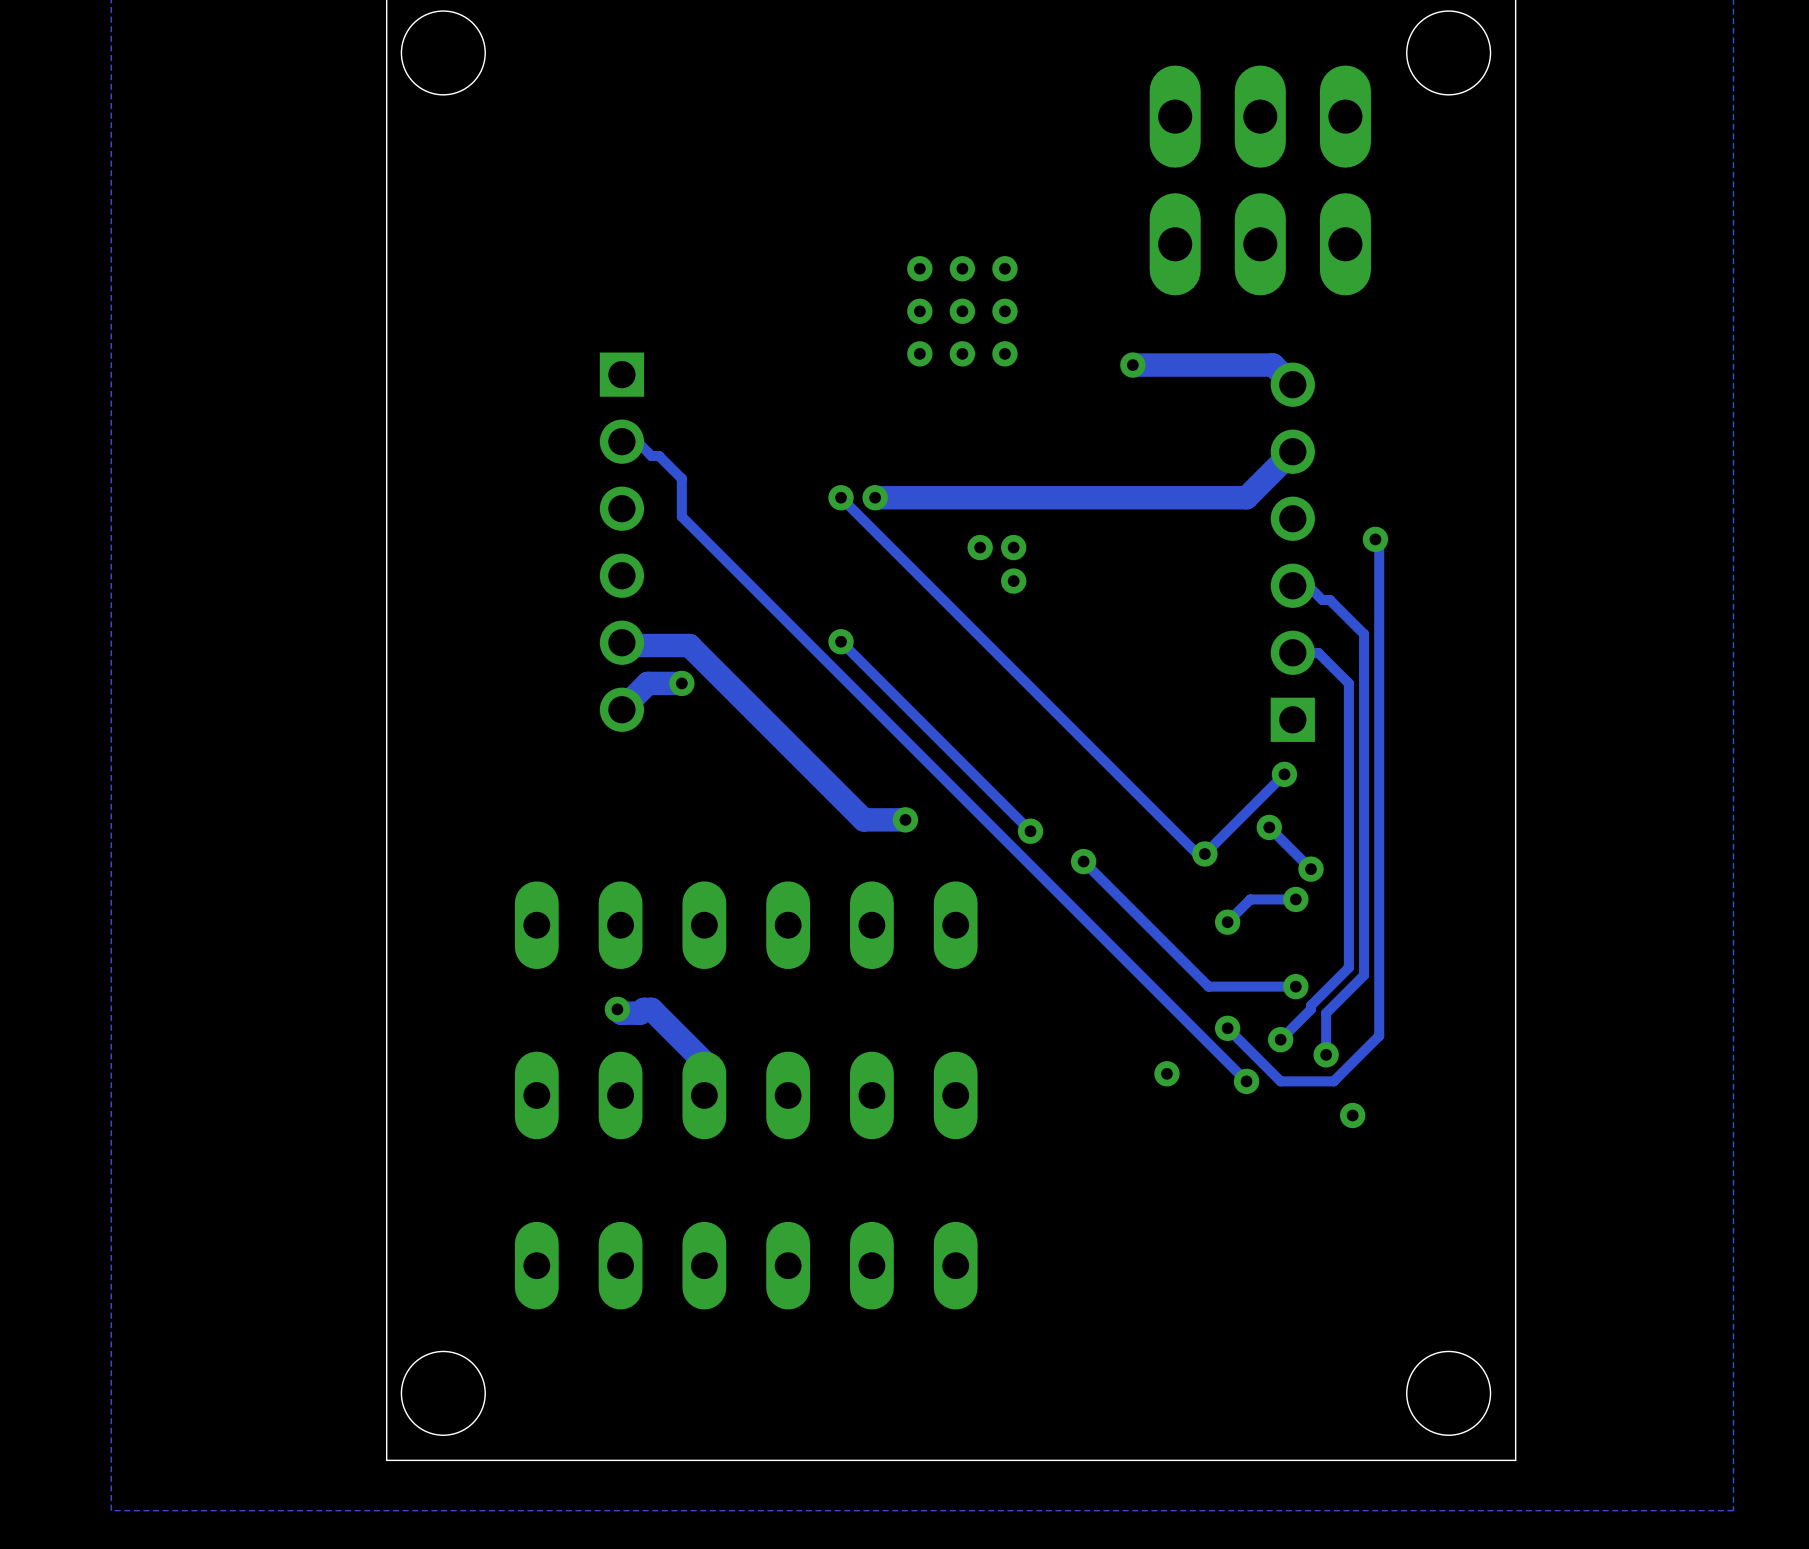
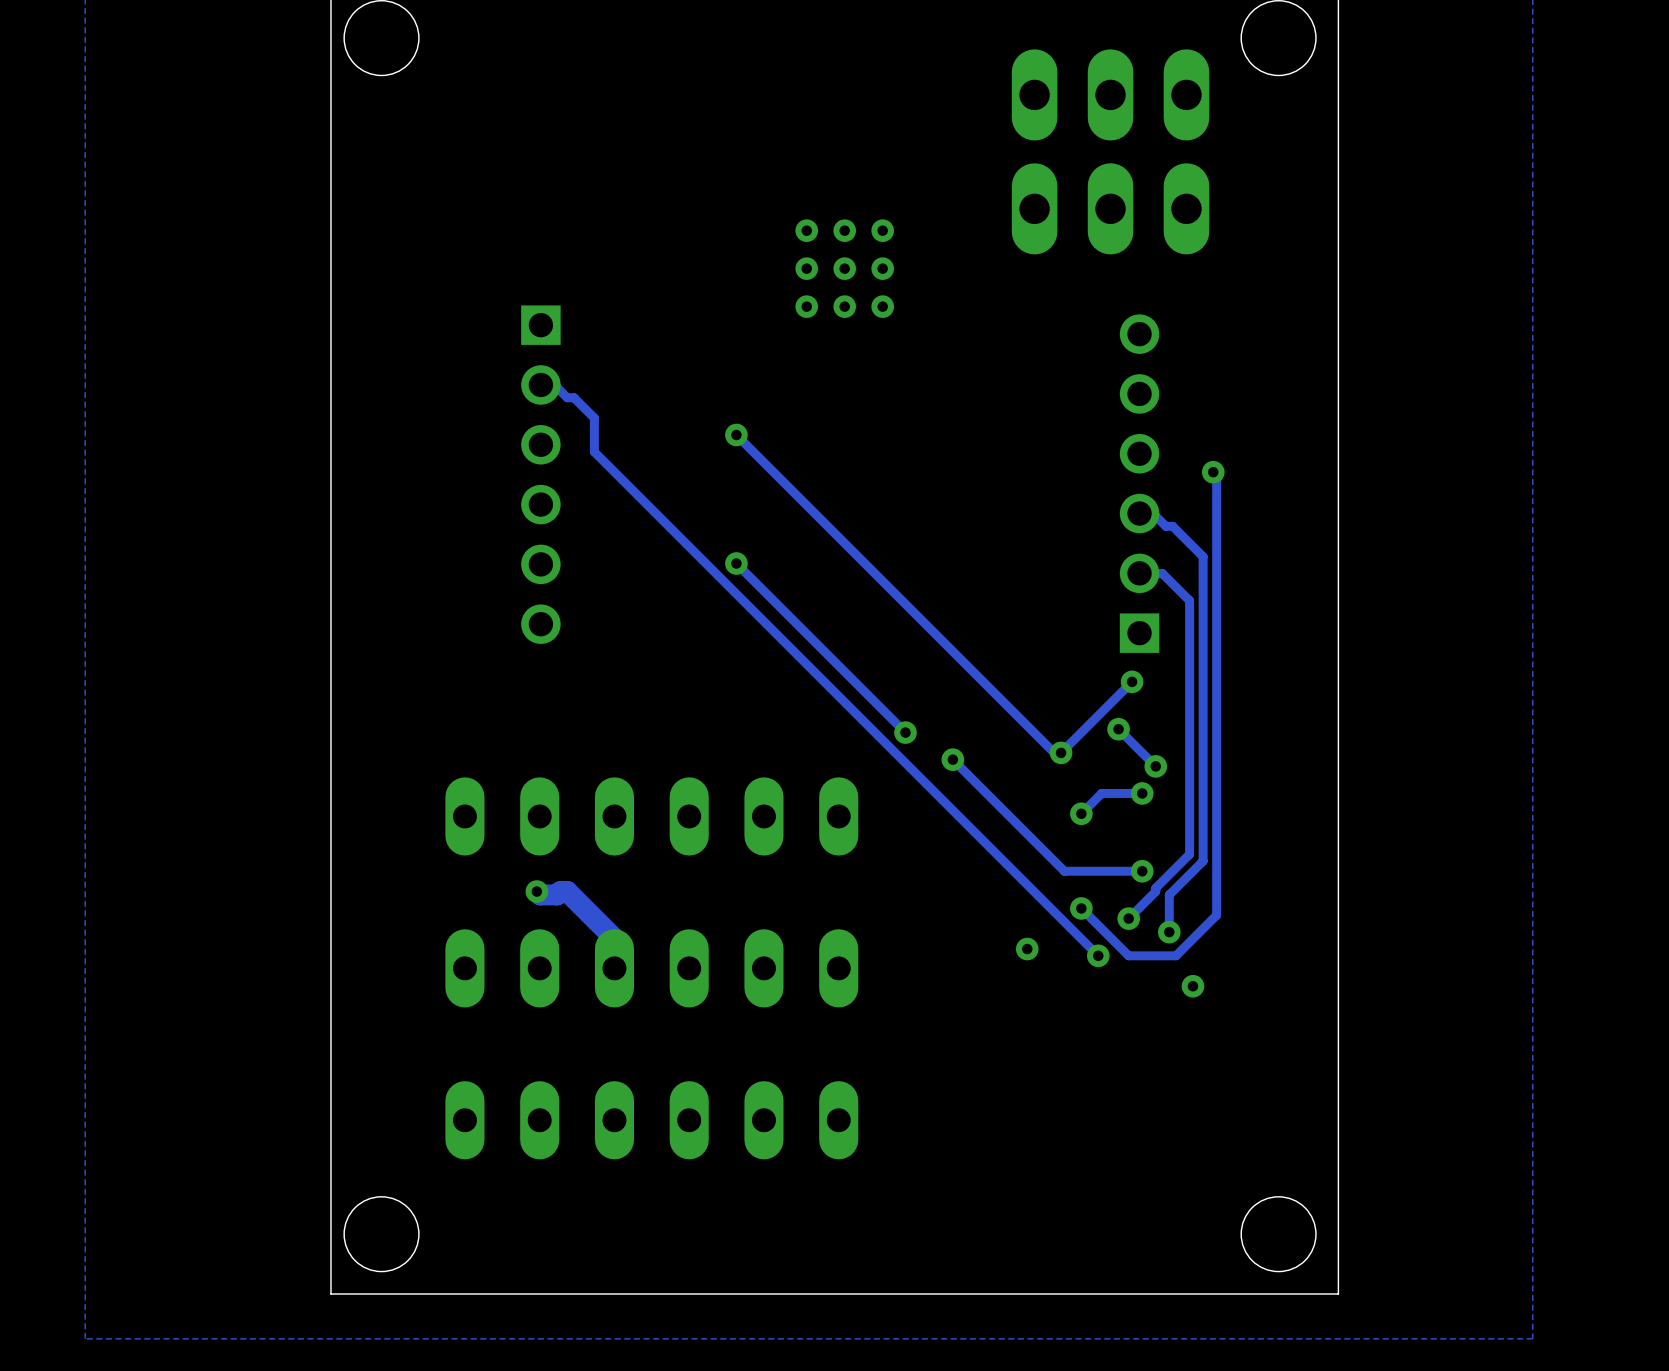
track: (1132, 365) (1273, 365) (1292, 384) -> none
via: (1132, 365) -> none
track: (1292, 451) (1246, 497) (875, 497) -> none
via: (875, 497) -> none
via: (980, 547) -> none
via: (1013, 547) -> none
via: (1013, 581) -> none
track: (621, 642) (625, 645) (689, 645) (863, 819) (905, 819) -> none
track: (681, 683) (647, 683) (621, 709) -> none
via: (681, 683) -> none
via: (905, 819) -> none

